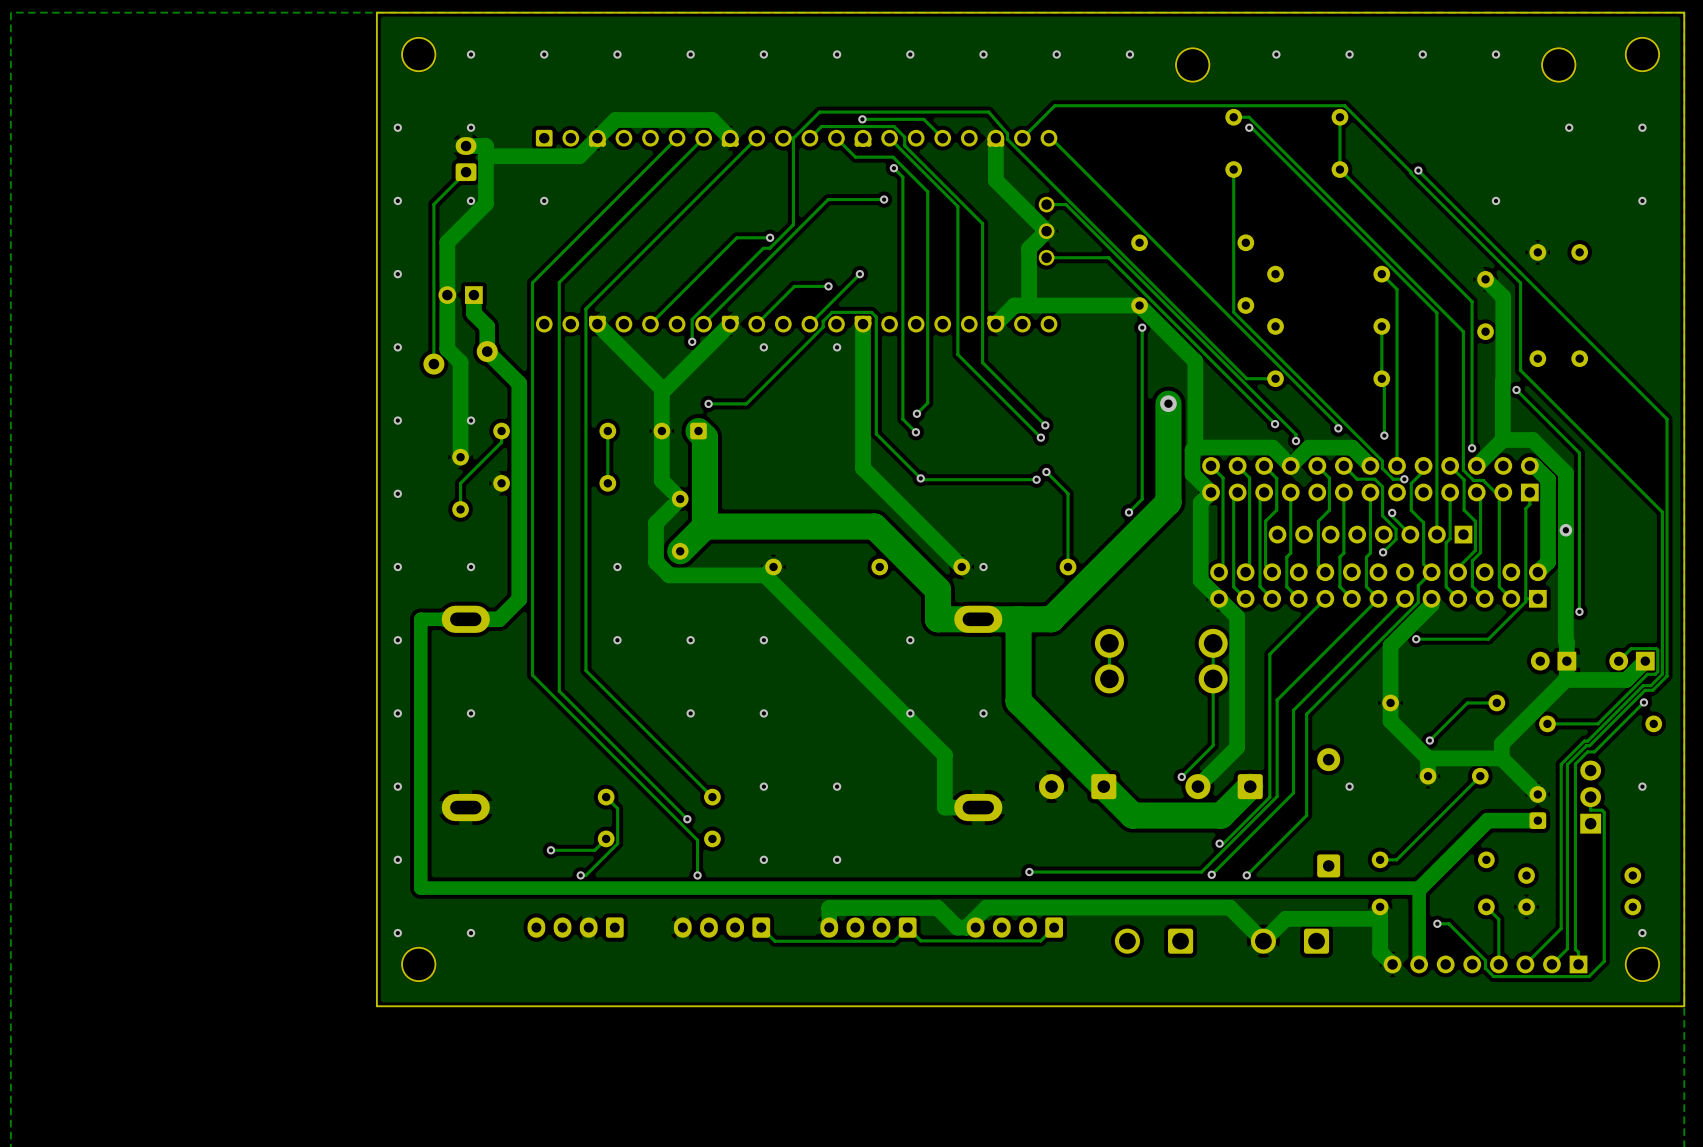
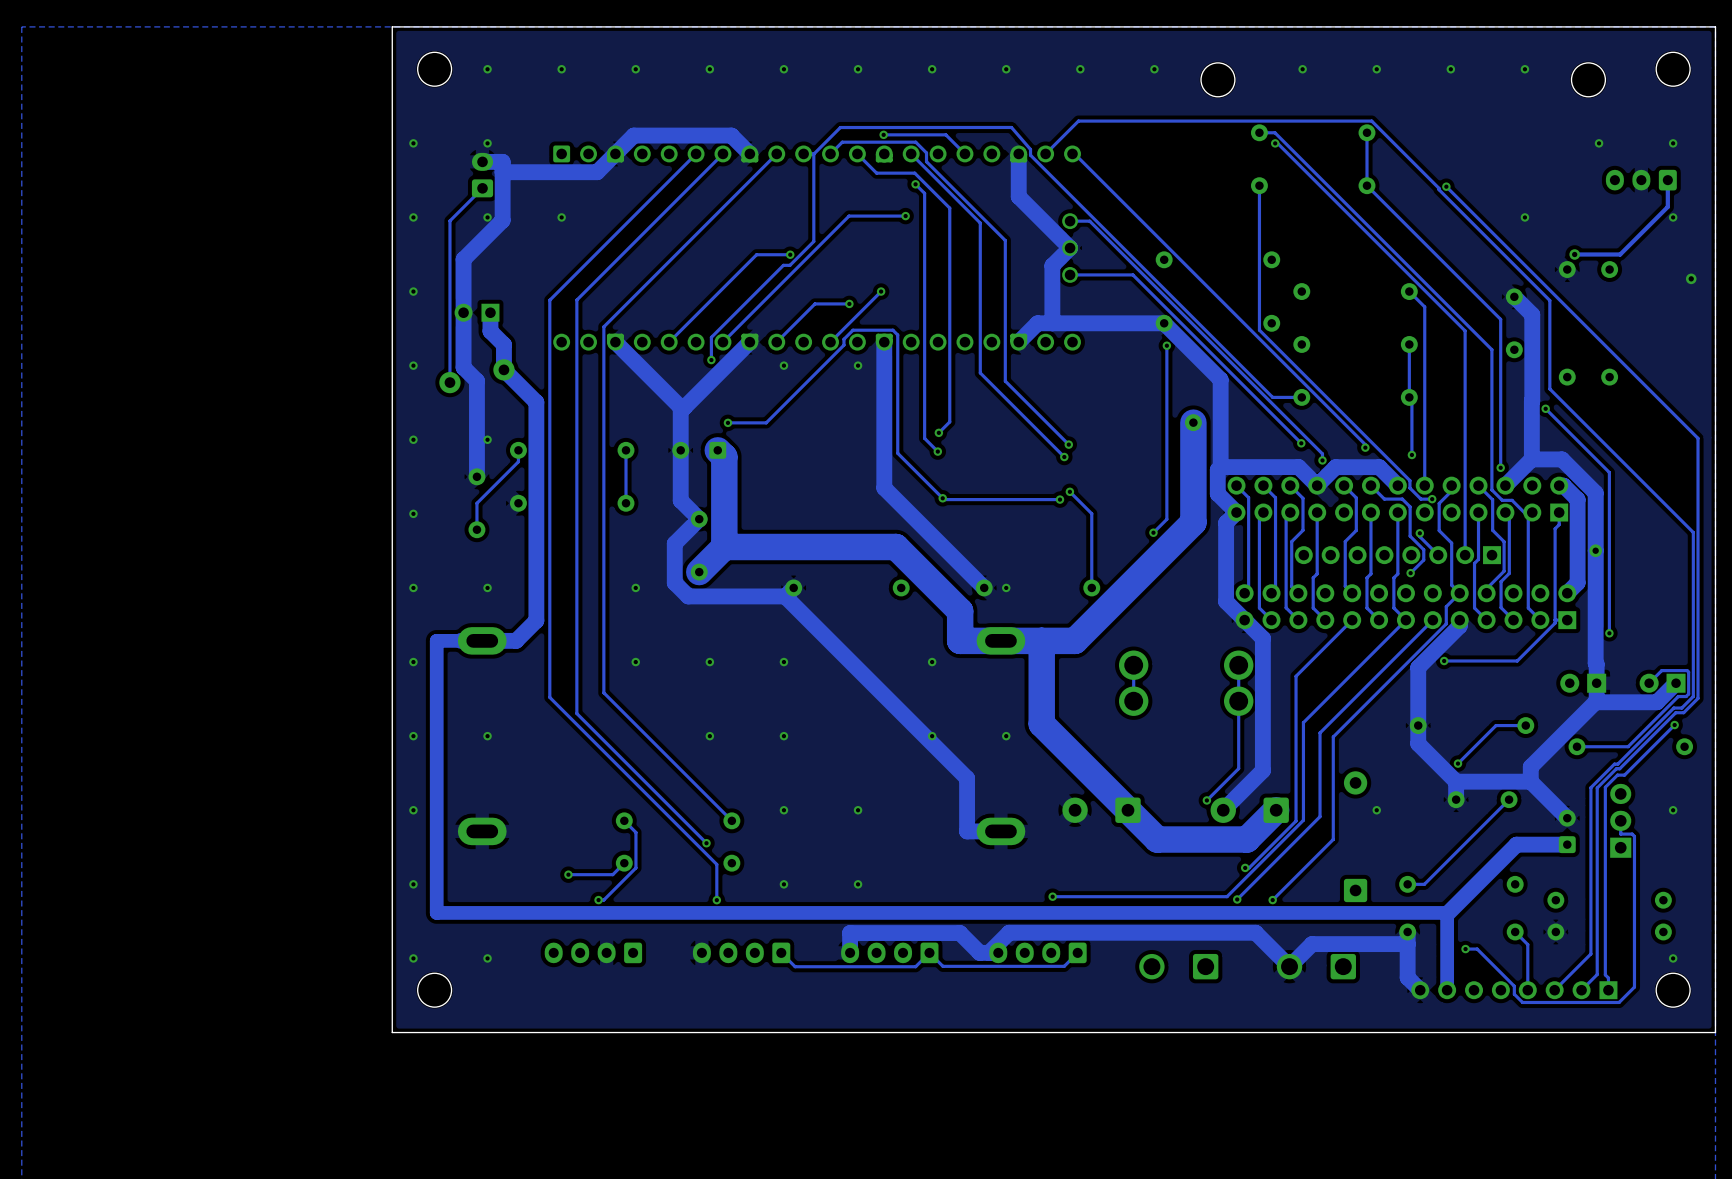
part: none -> (1641, 180)
track: none -> (1667, 180) (1667, 206) (1620, 254) (1574, 254)
via: none -> (1574, 254)
via: none -> (1691, 278)

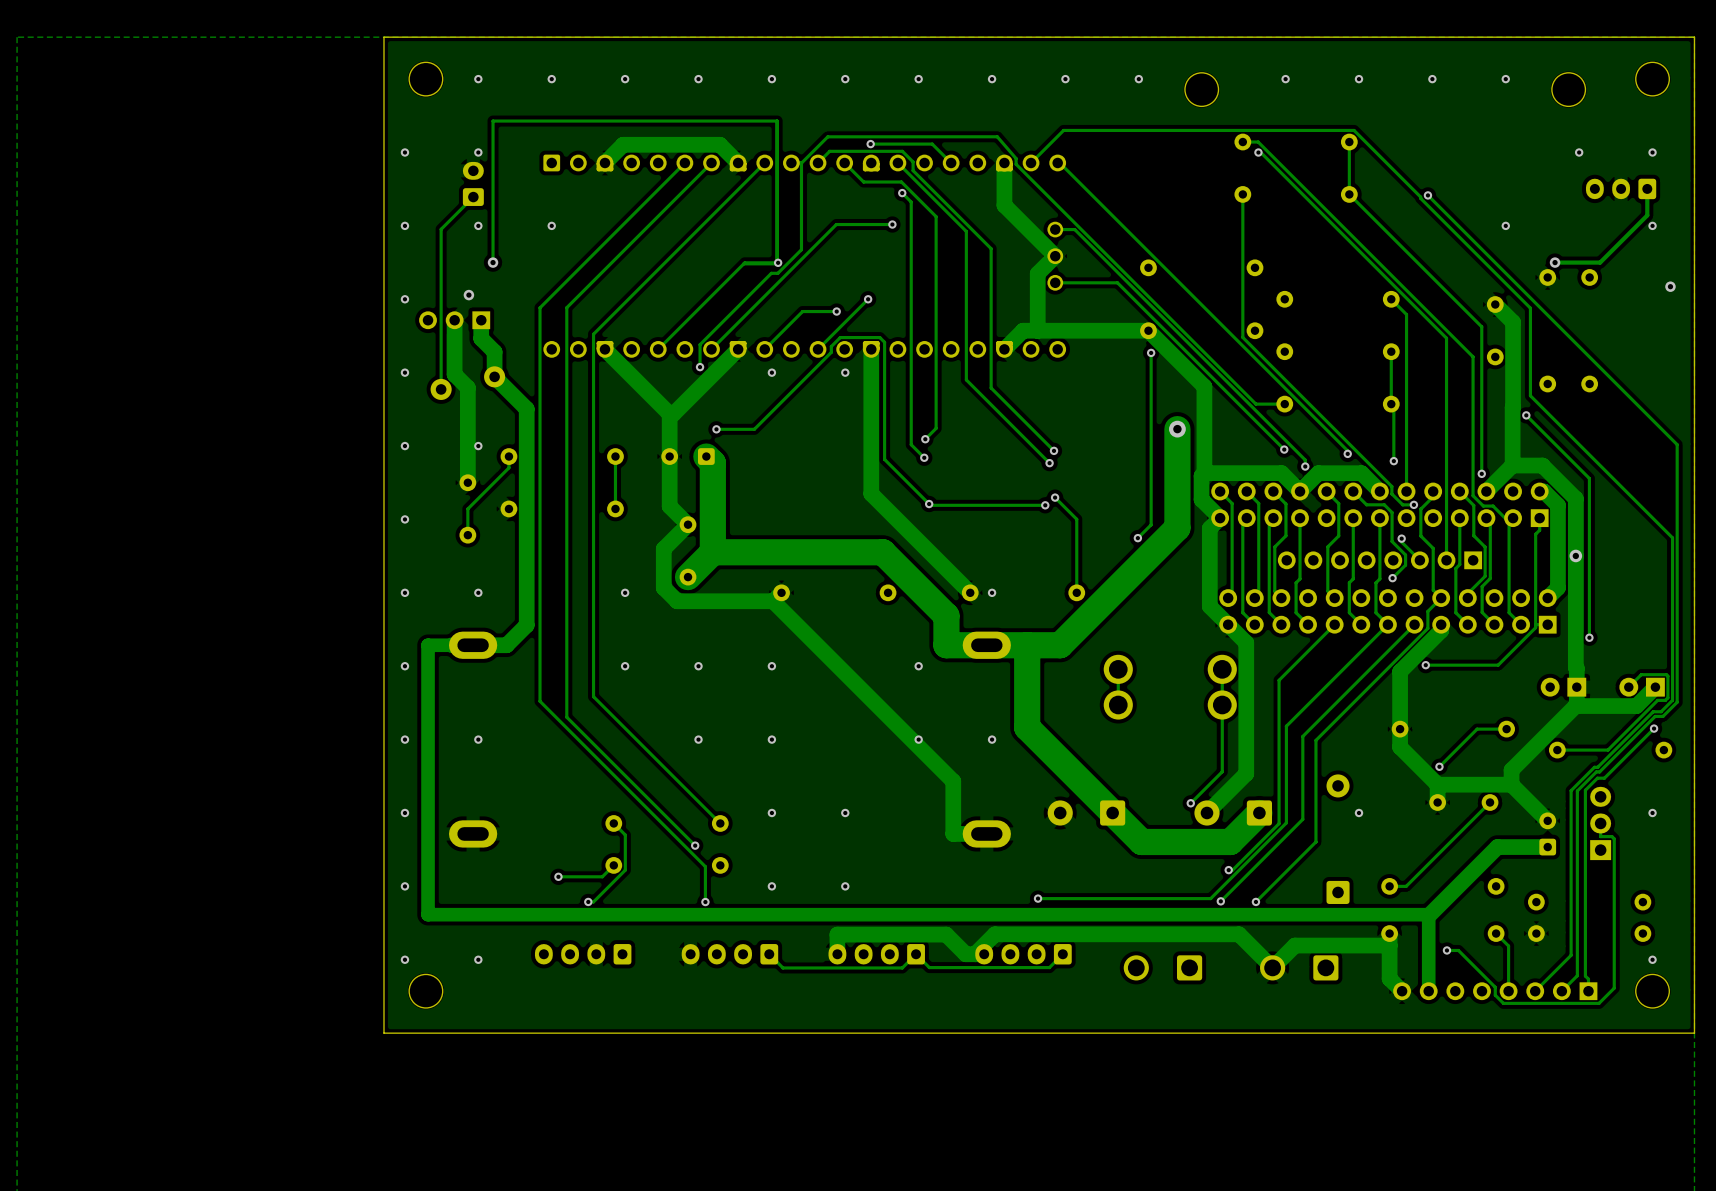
track: (615, 153) (597, 172) (502, 172) -> none
track: (482, 161) (502, 161) (502, 220) (463, 259) (463, 312) -> none
track: none -> (493, 262) (493, 121) (777, 121) (777, 263) (744, 263)
via: none -> (493, 262)
via: none -> (468, 295)
part: none -> (454, 320)
part: (477, 312) -> none

